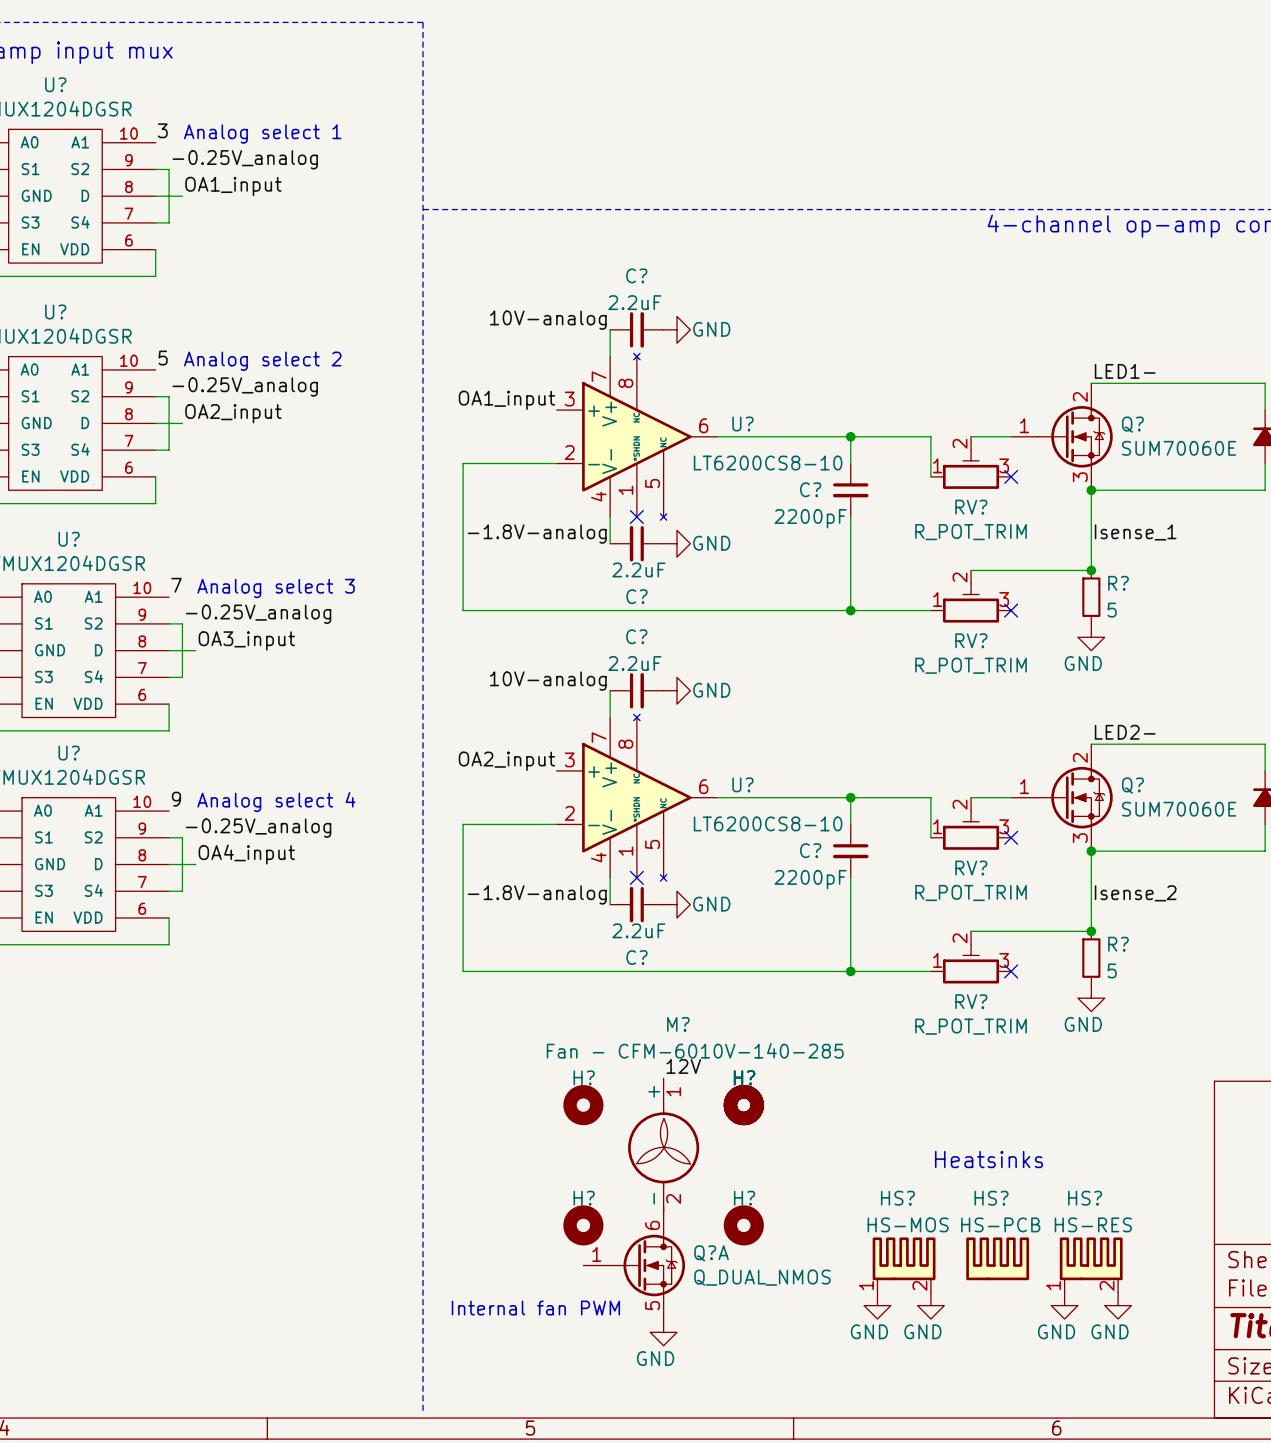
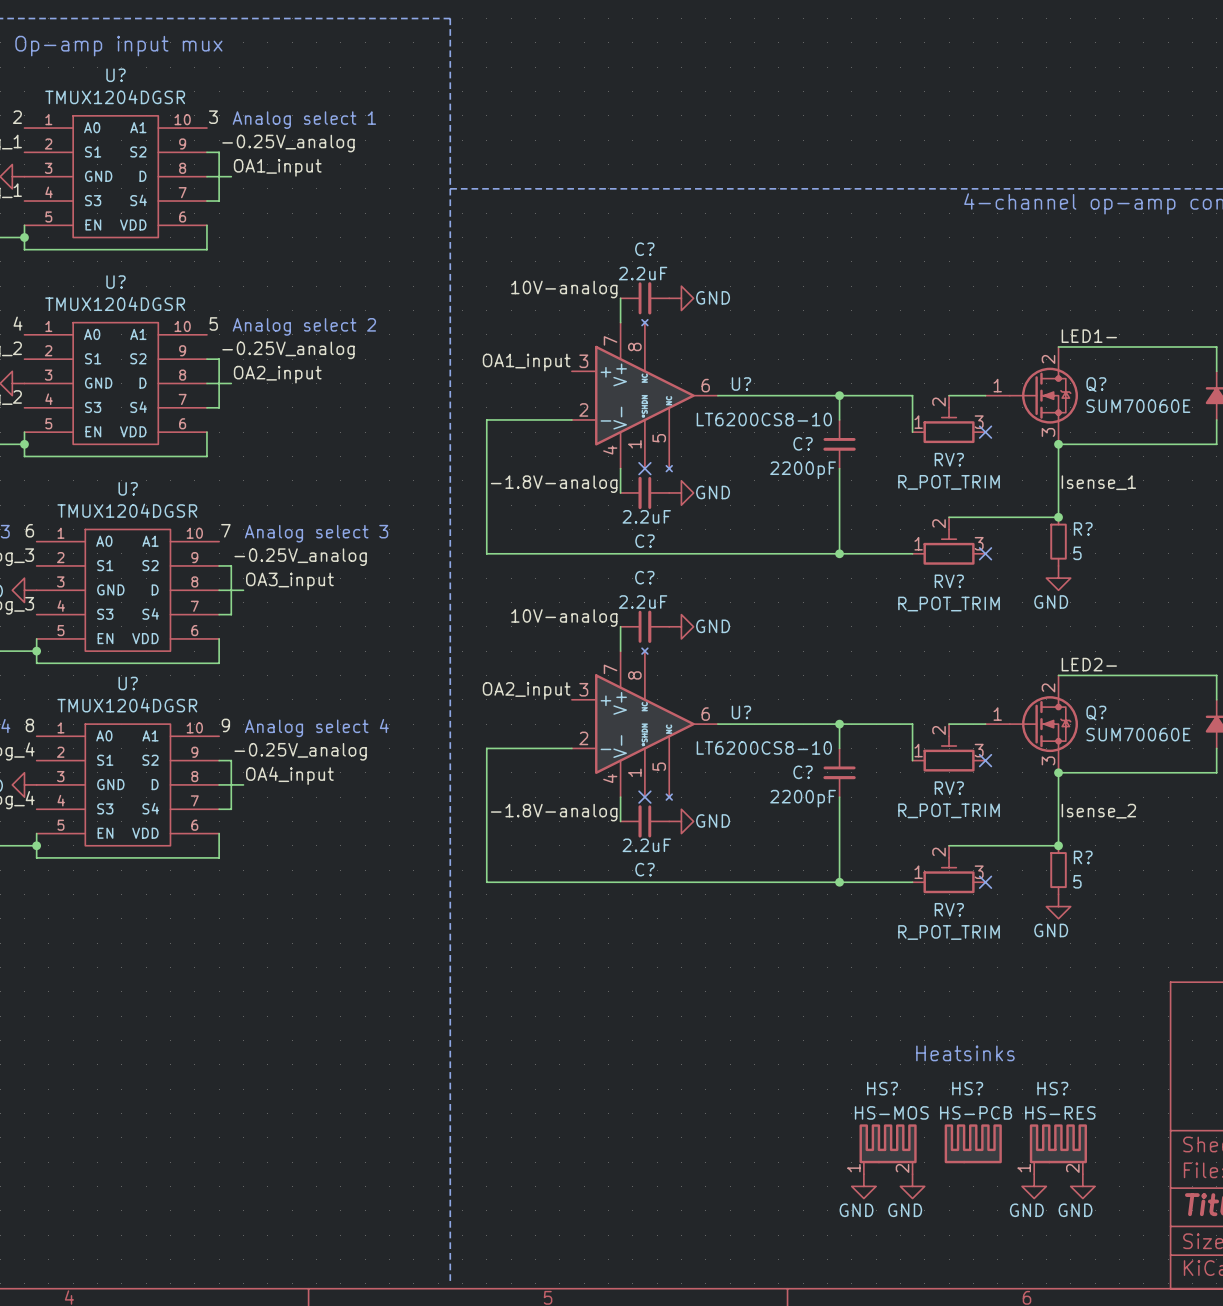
label: 12V (683, 1066) -> none
H?: (583, 1105) -> none
H?: (743, 1105) -> none
M?: Fan - CFM-6010V-140-285 (663, 1145) -> none
H?: (583, 1225) -> none
H?: (743, 1225) -> none
Q?A: Q_DUAL_NMOS (634, 1265) -> none
text: Internal fan PWM (535, 1308) -> none
power symbol: GND (663, 1332) -> none

